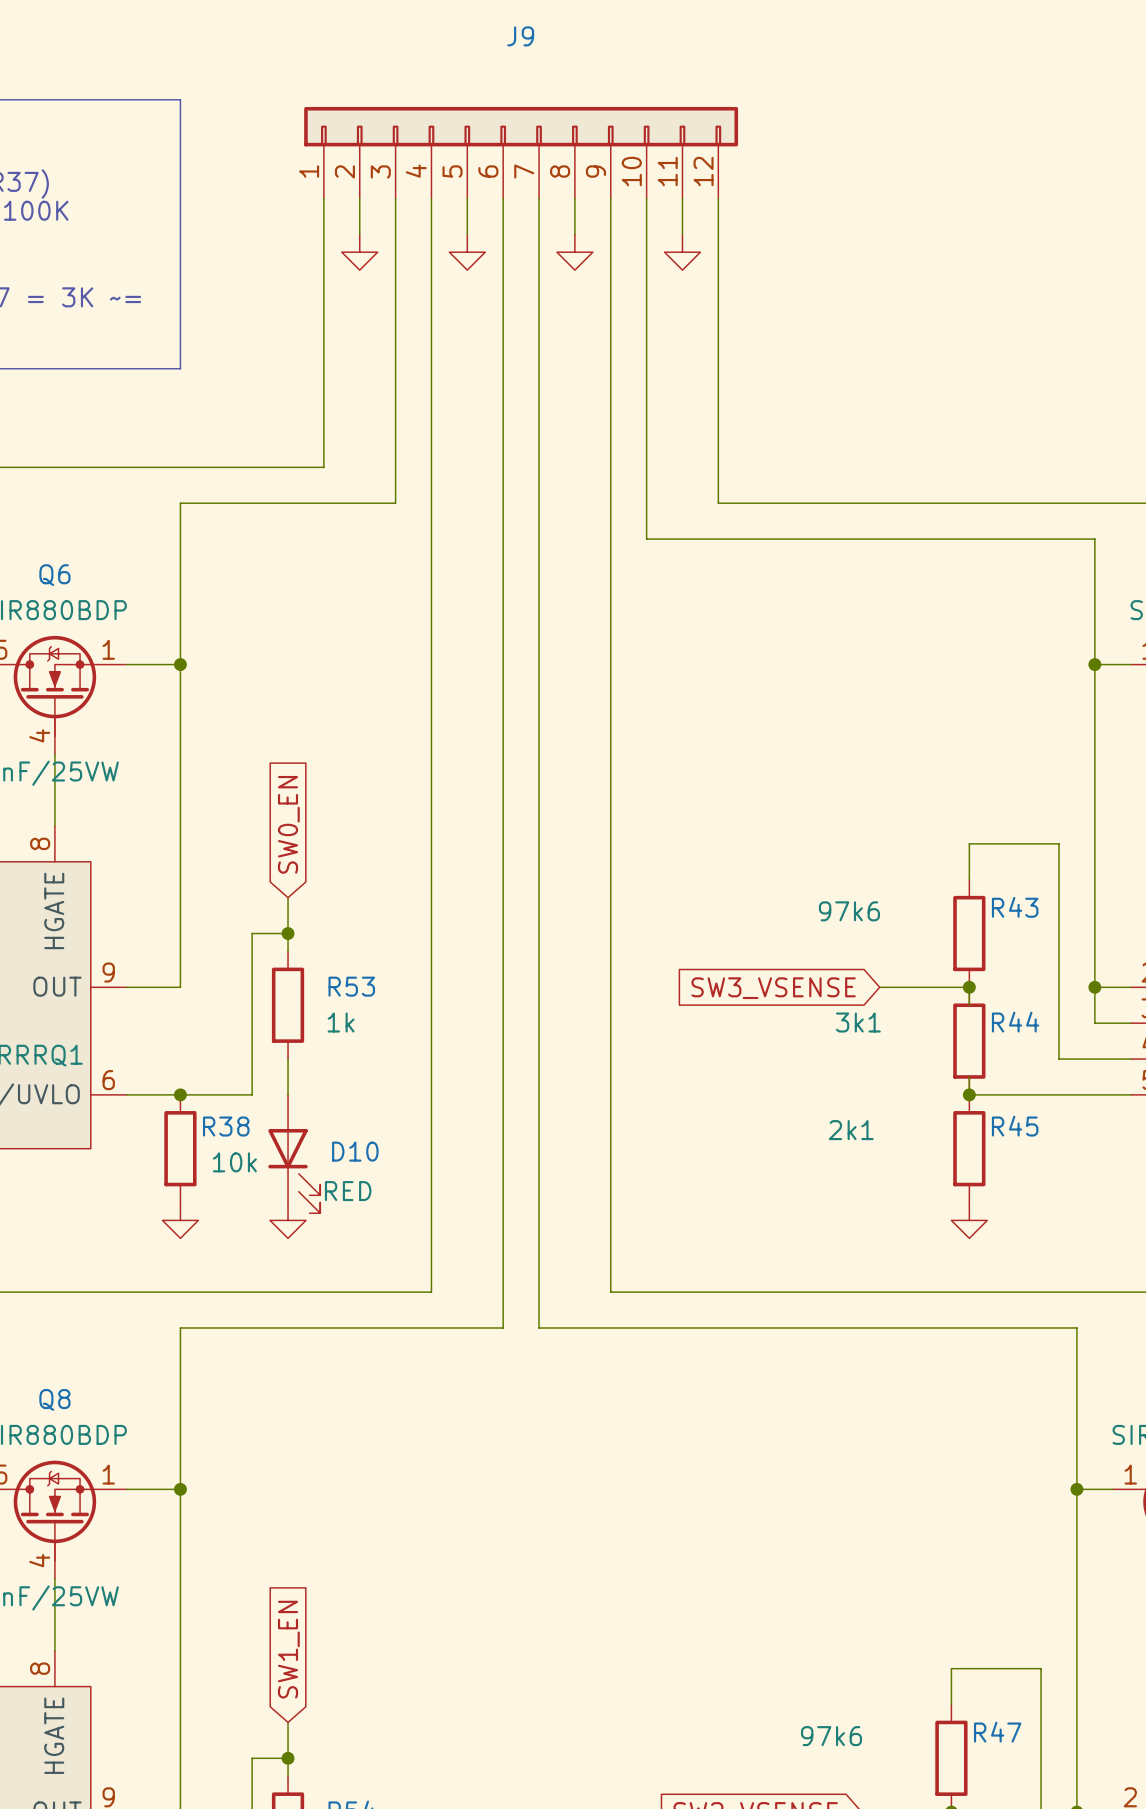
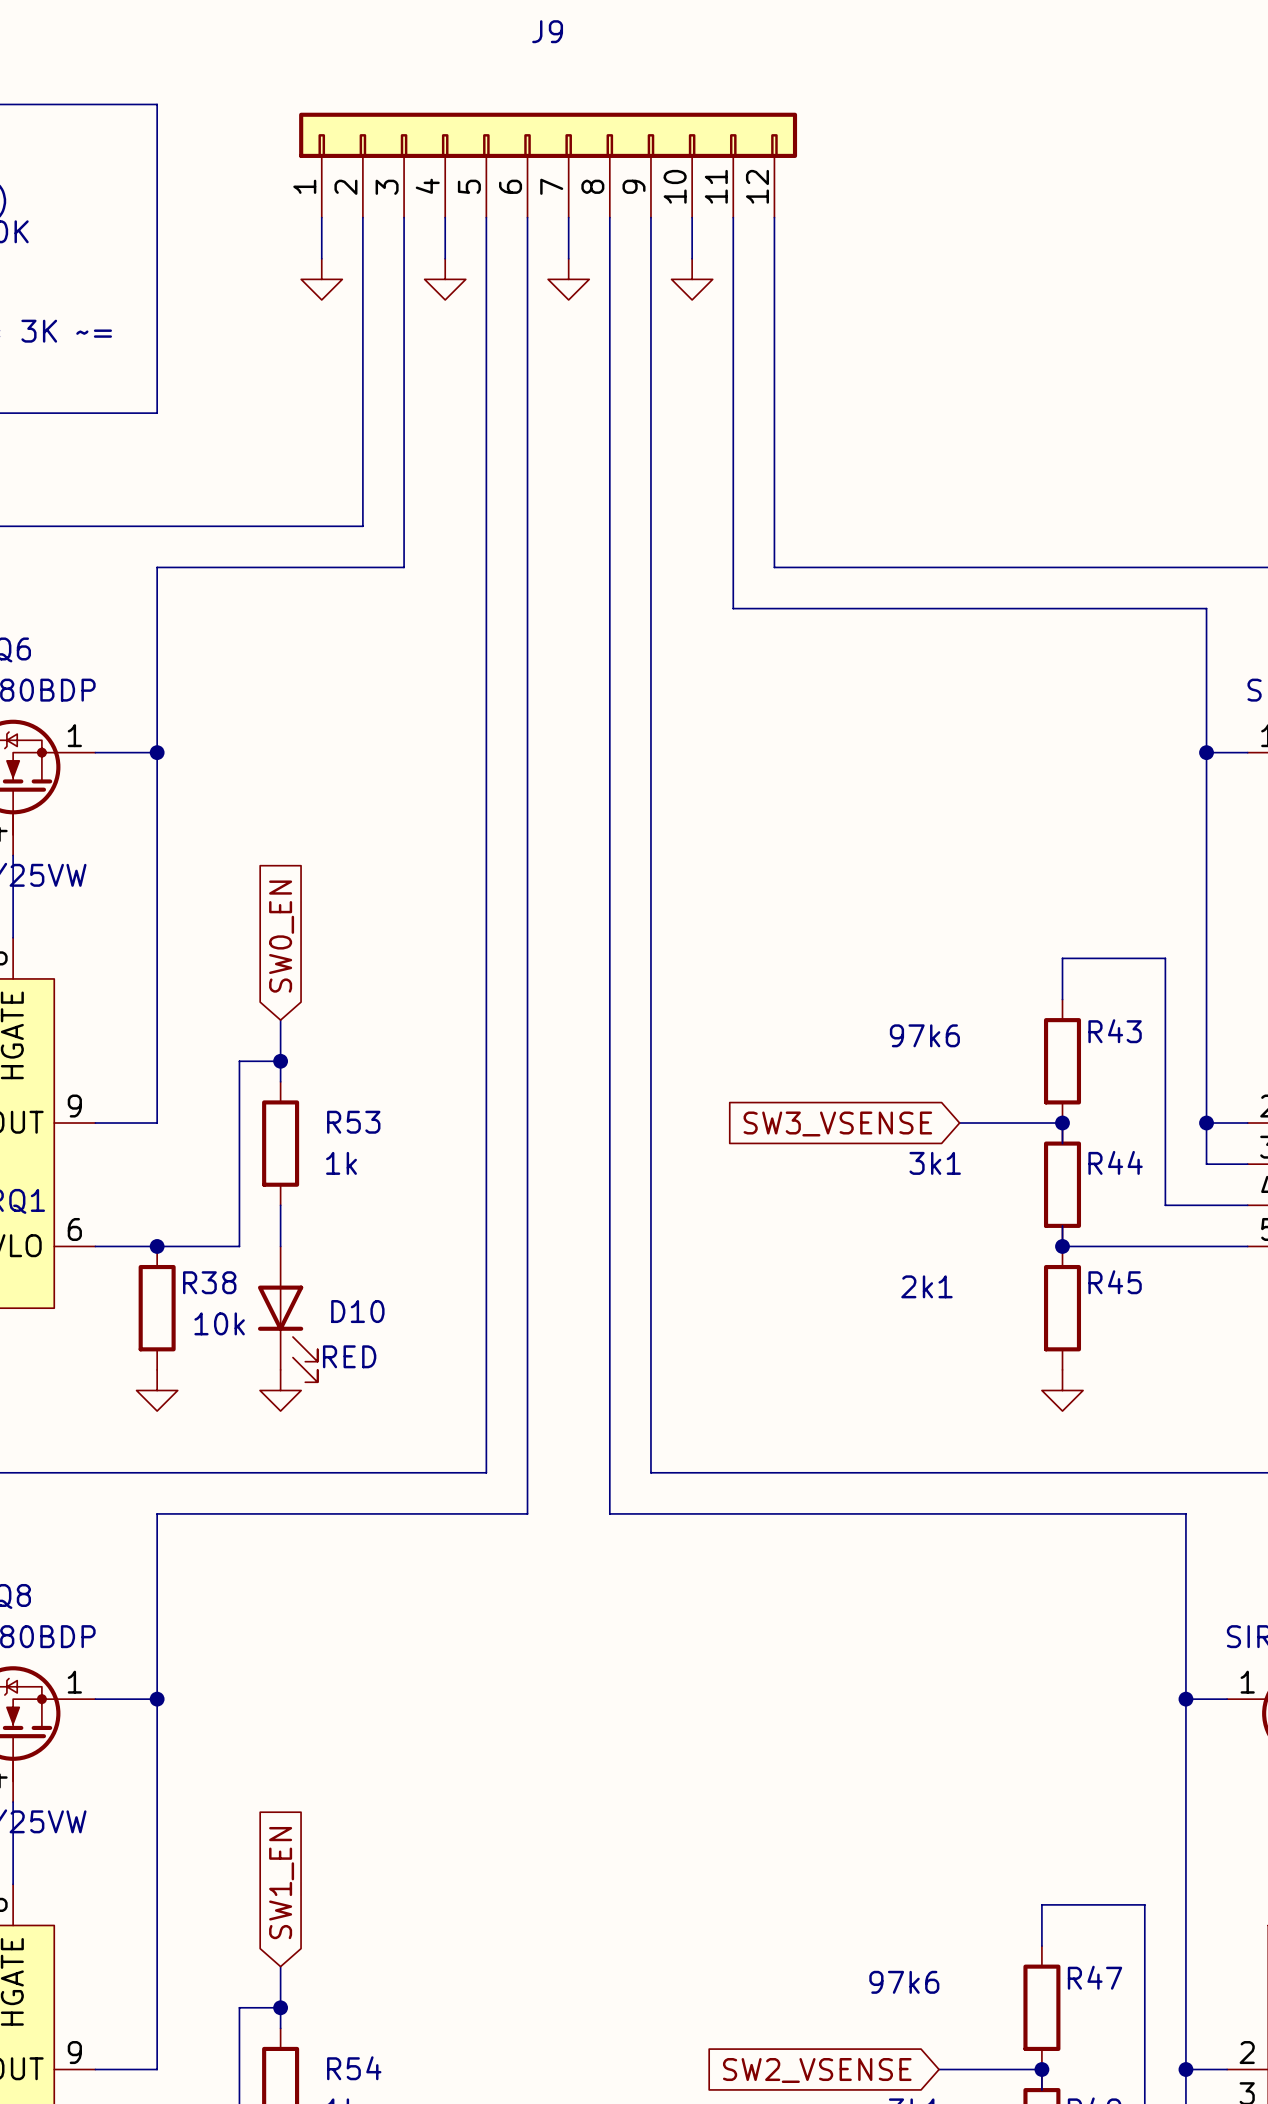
wire: (323, 234) (323, 467) -> (362, 258) (362, 526) (321, 526)
wire: (431, 234) (431, 1292) -> (486, 258) (486, 1472) (445, 1472)
wire: (539, 234) (539, 1327) (574, 1327) -> (609, 258) (609, 1513)
wire: (646, 234) (646, 539) (682, 539) -> (733, 258) (733, 608)
power symbol: none -> (321, 279)
power symbol: (359, 252) -> none
power symbol: none -> (445, 279)
power symbol: (467, 252) -> none
power symbol: none -> (568, 279)
power symbol: (574, 252) -> none
power symbol: none -> (692, 279)
power symbol: (682, 252) -> none

